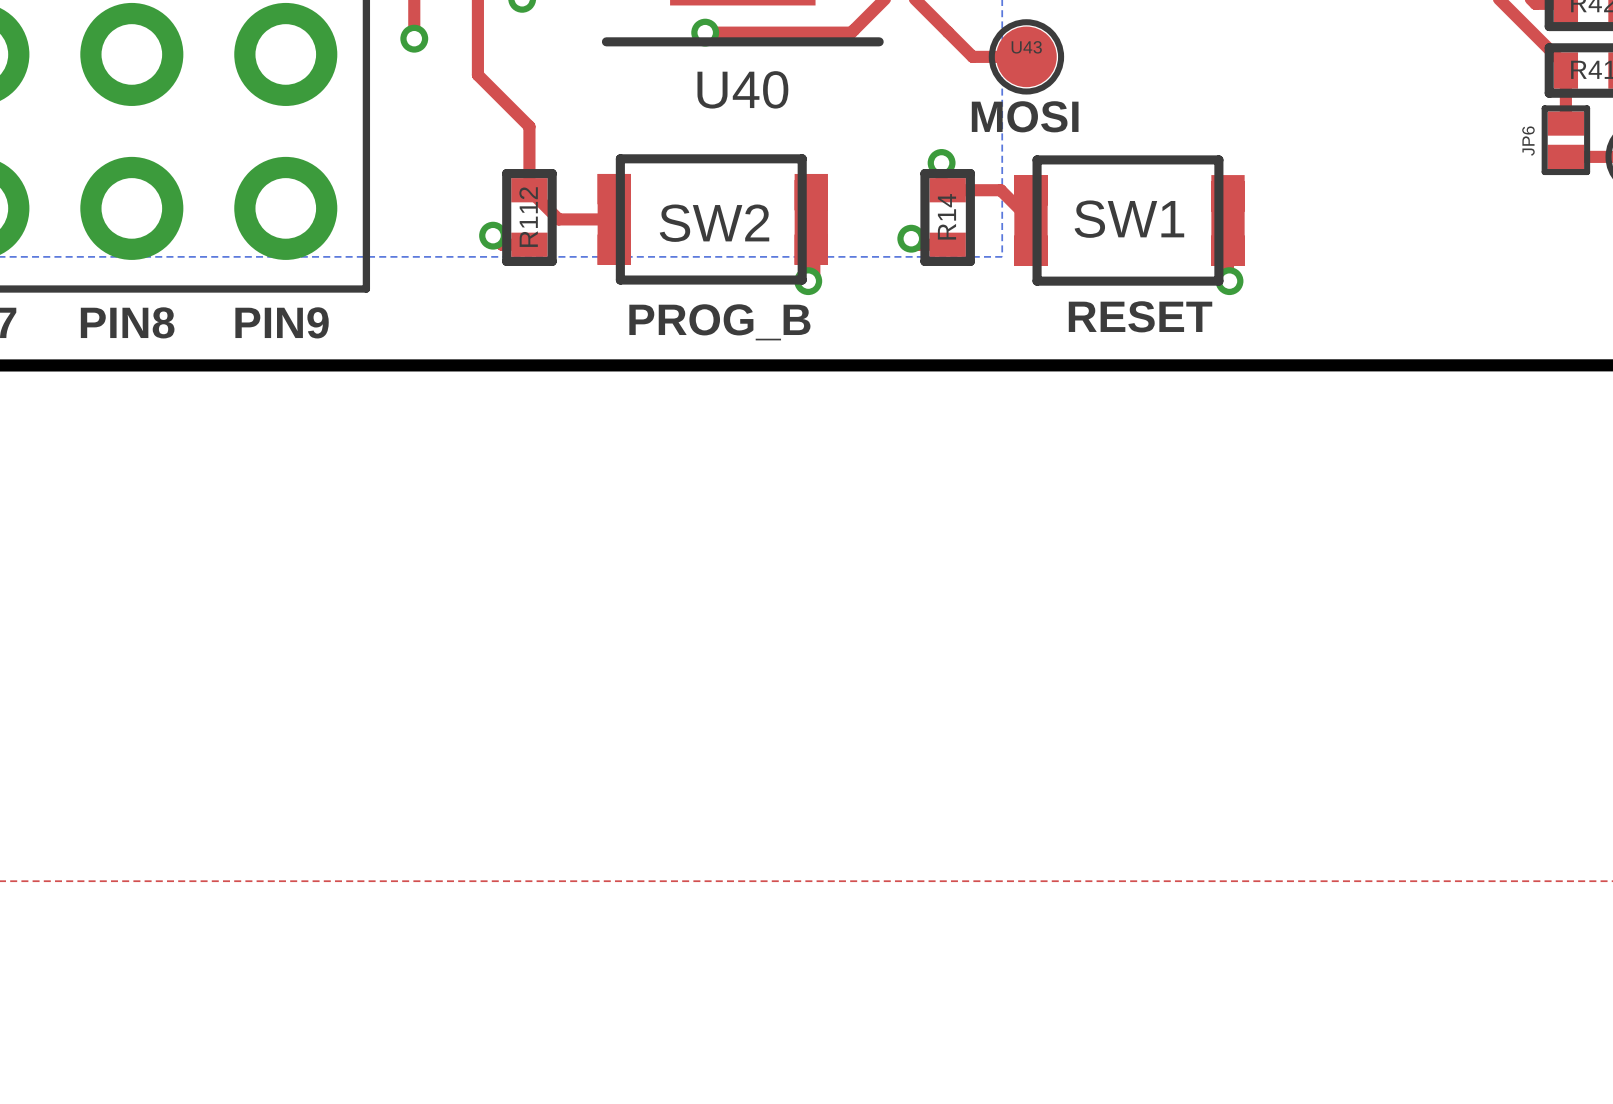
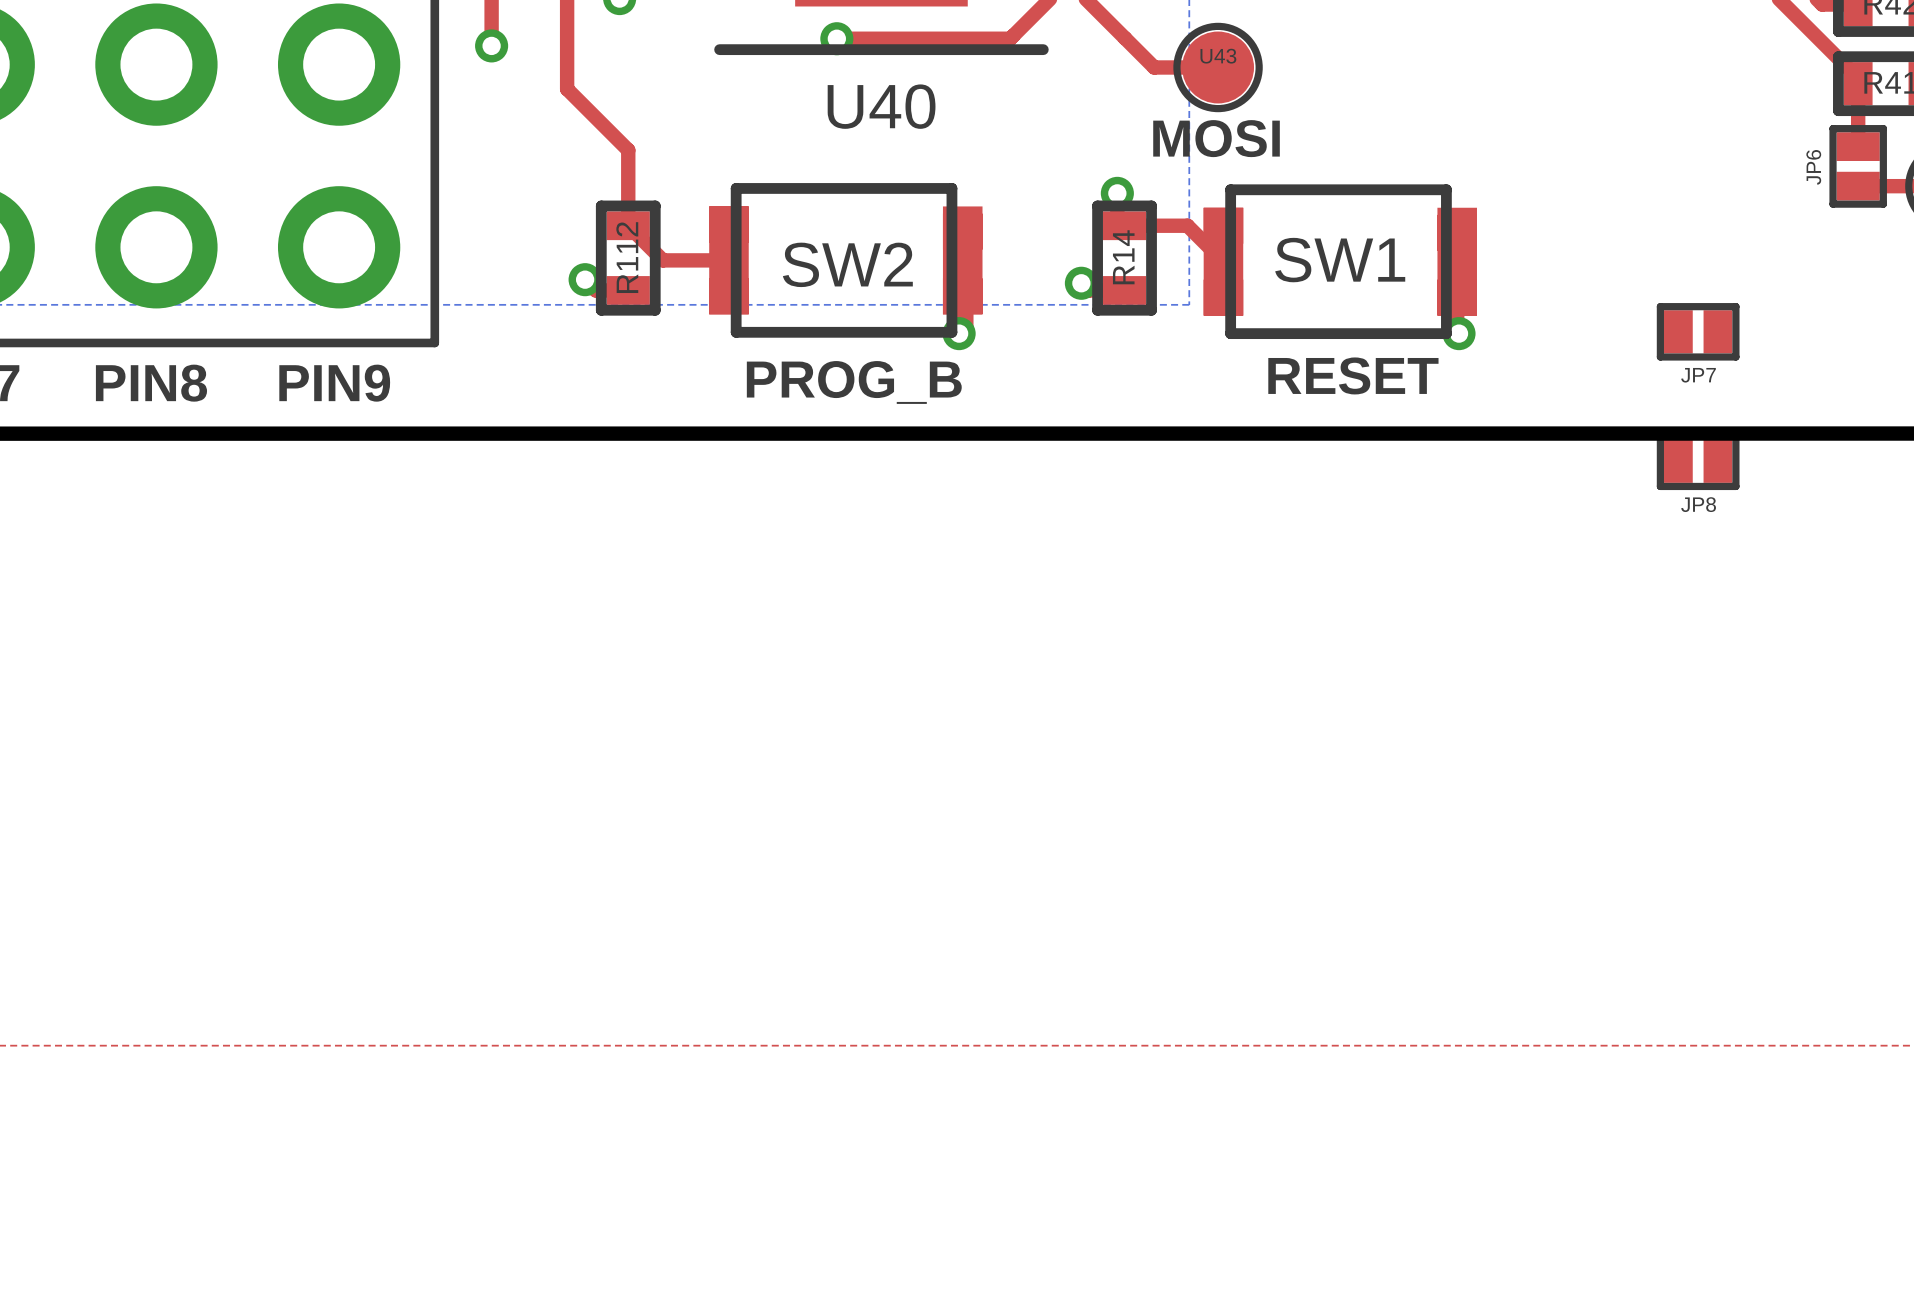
JP7: none -> (1698, 331)
JP8: none -> (1698, 461)

